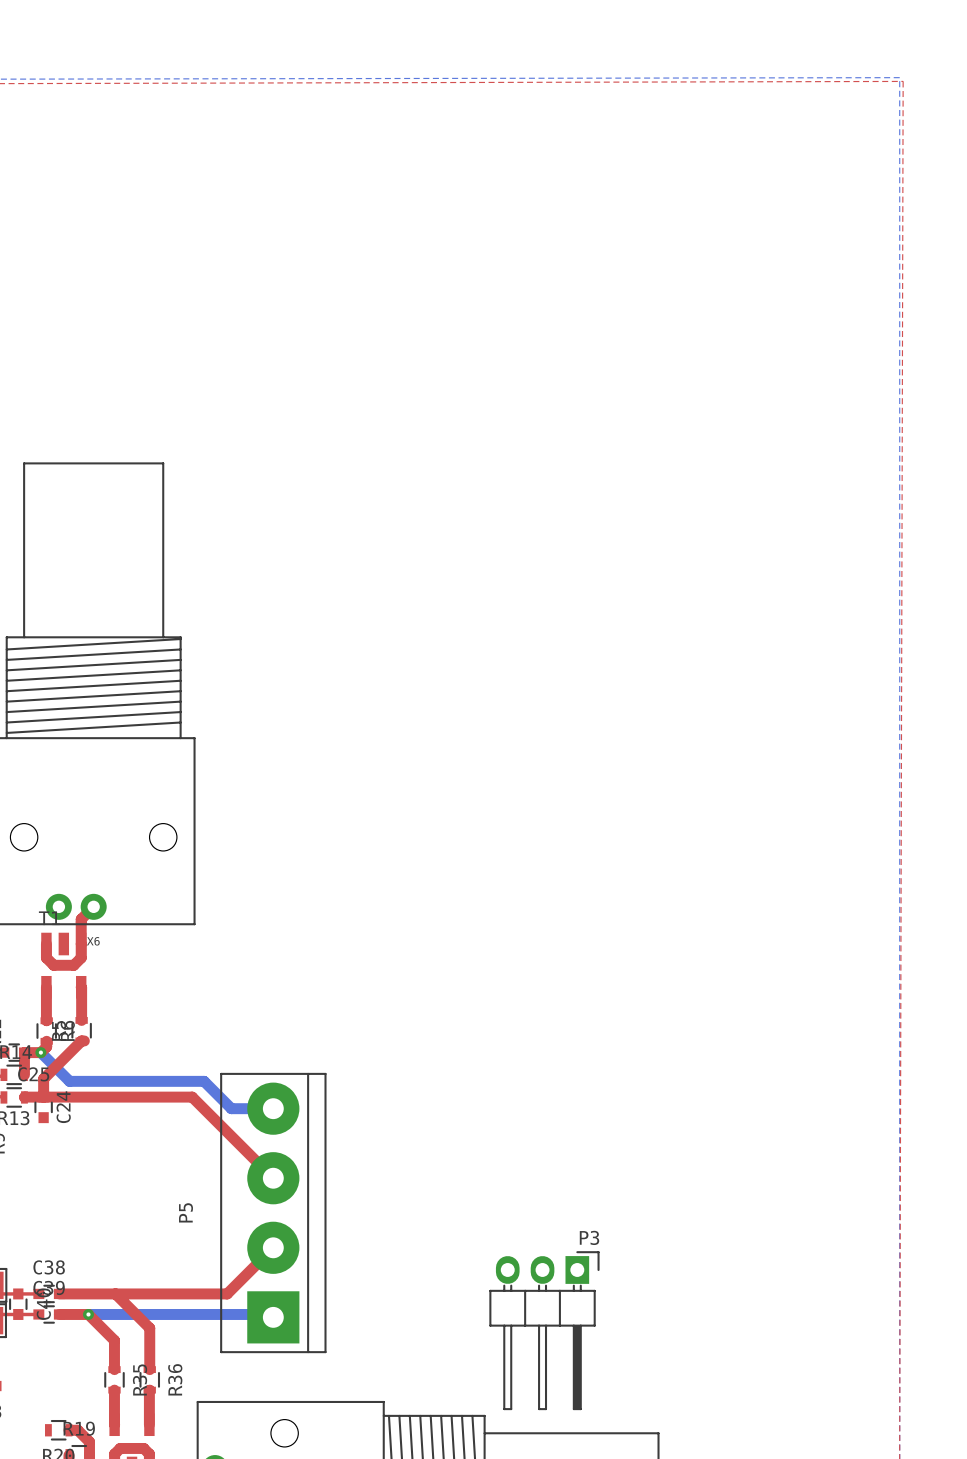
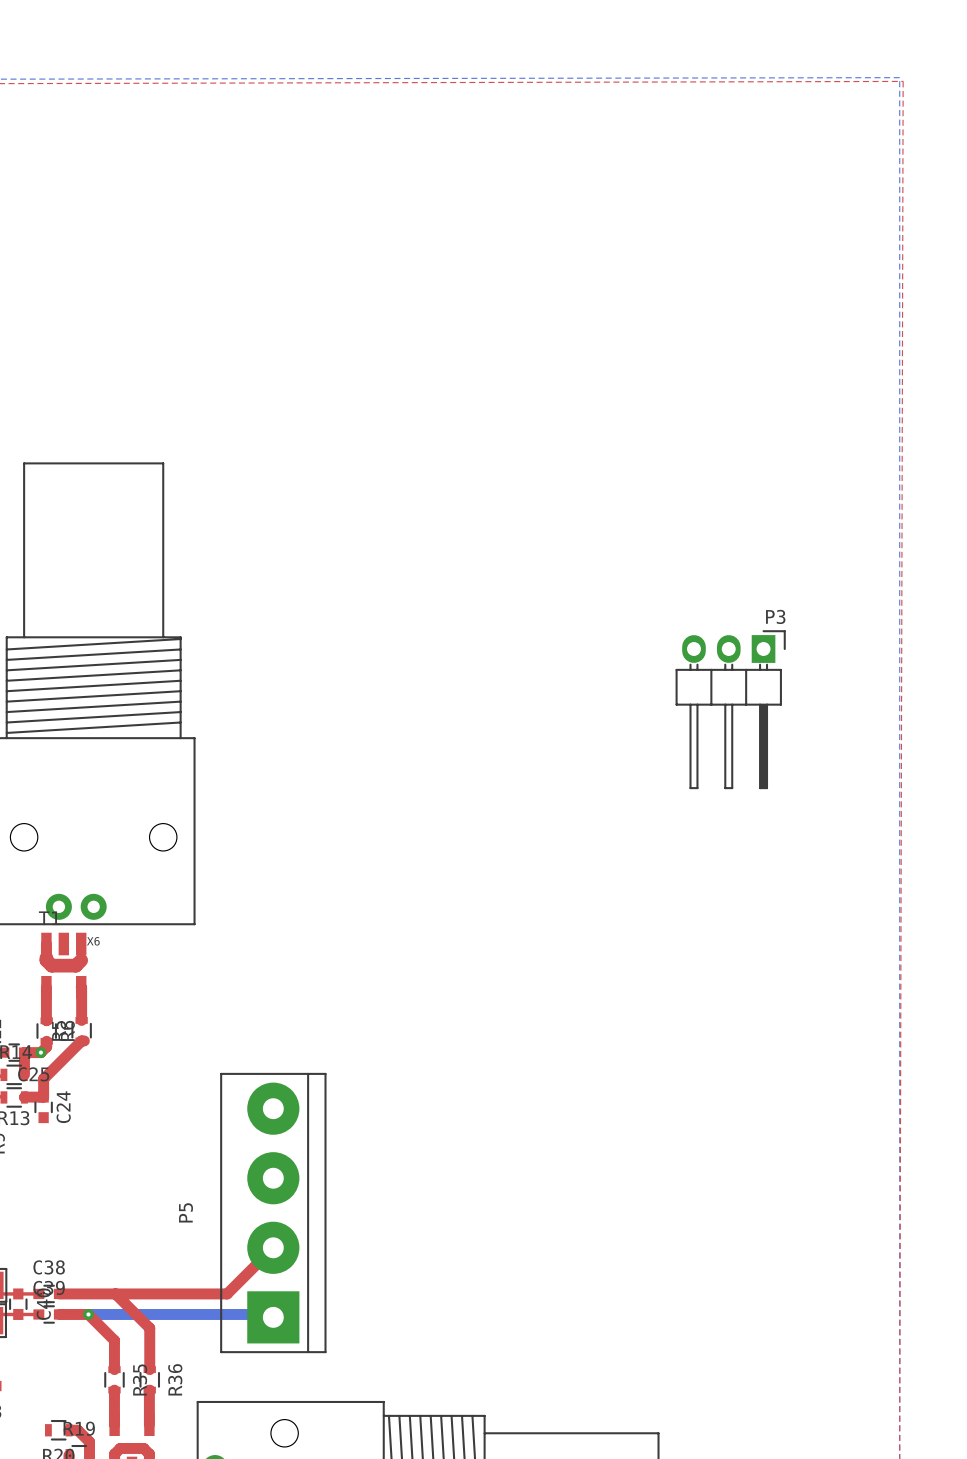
top track: (93, 906) (81, 919) (81, 957) (73, 965) (53, 965) (46, 957) -> (81, 960) (75, 965) (51, 965) (46, 957)
bottom track: (40, 1052) (69, 1081) (204, 1081) (231, 1108) (273, 1108) -> none
top track: (43, 1097) (192, 1097) (273, 1178) -> none
P3 position: (544, 1330) -> (730, 709)

